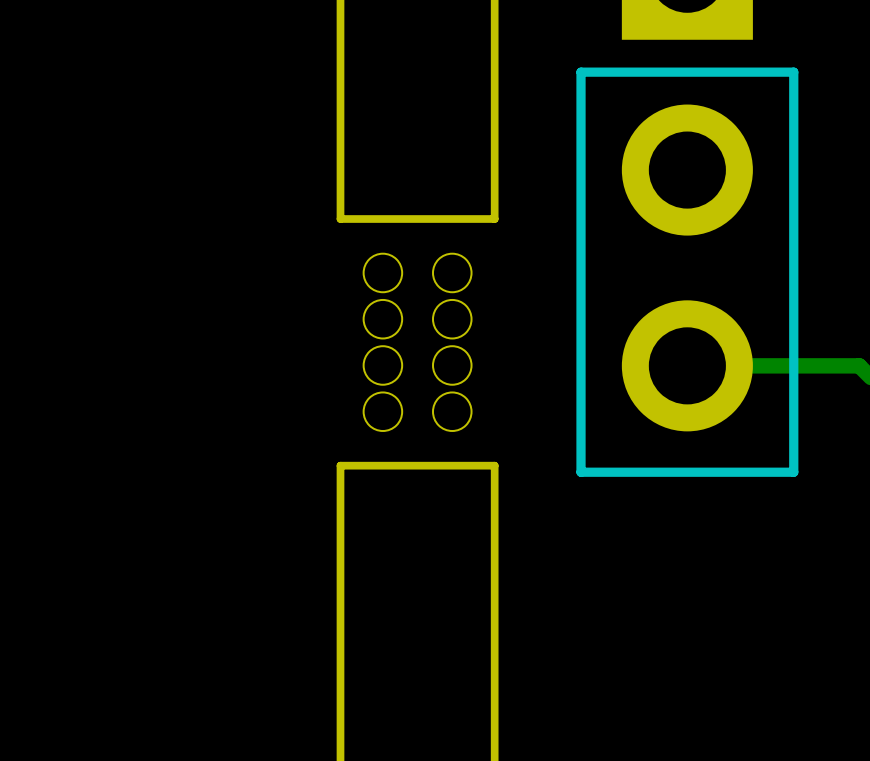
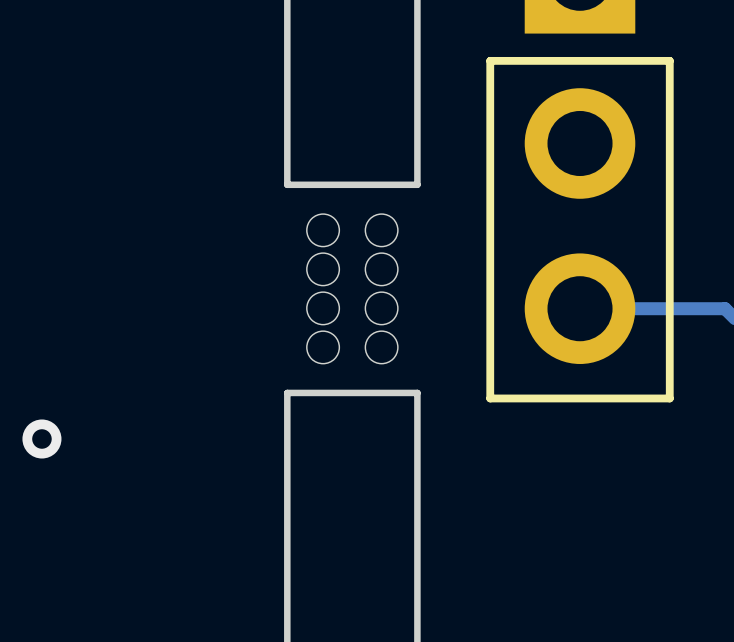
via: none -> (41, 438)

